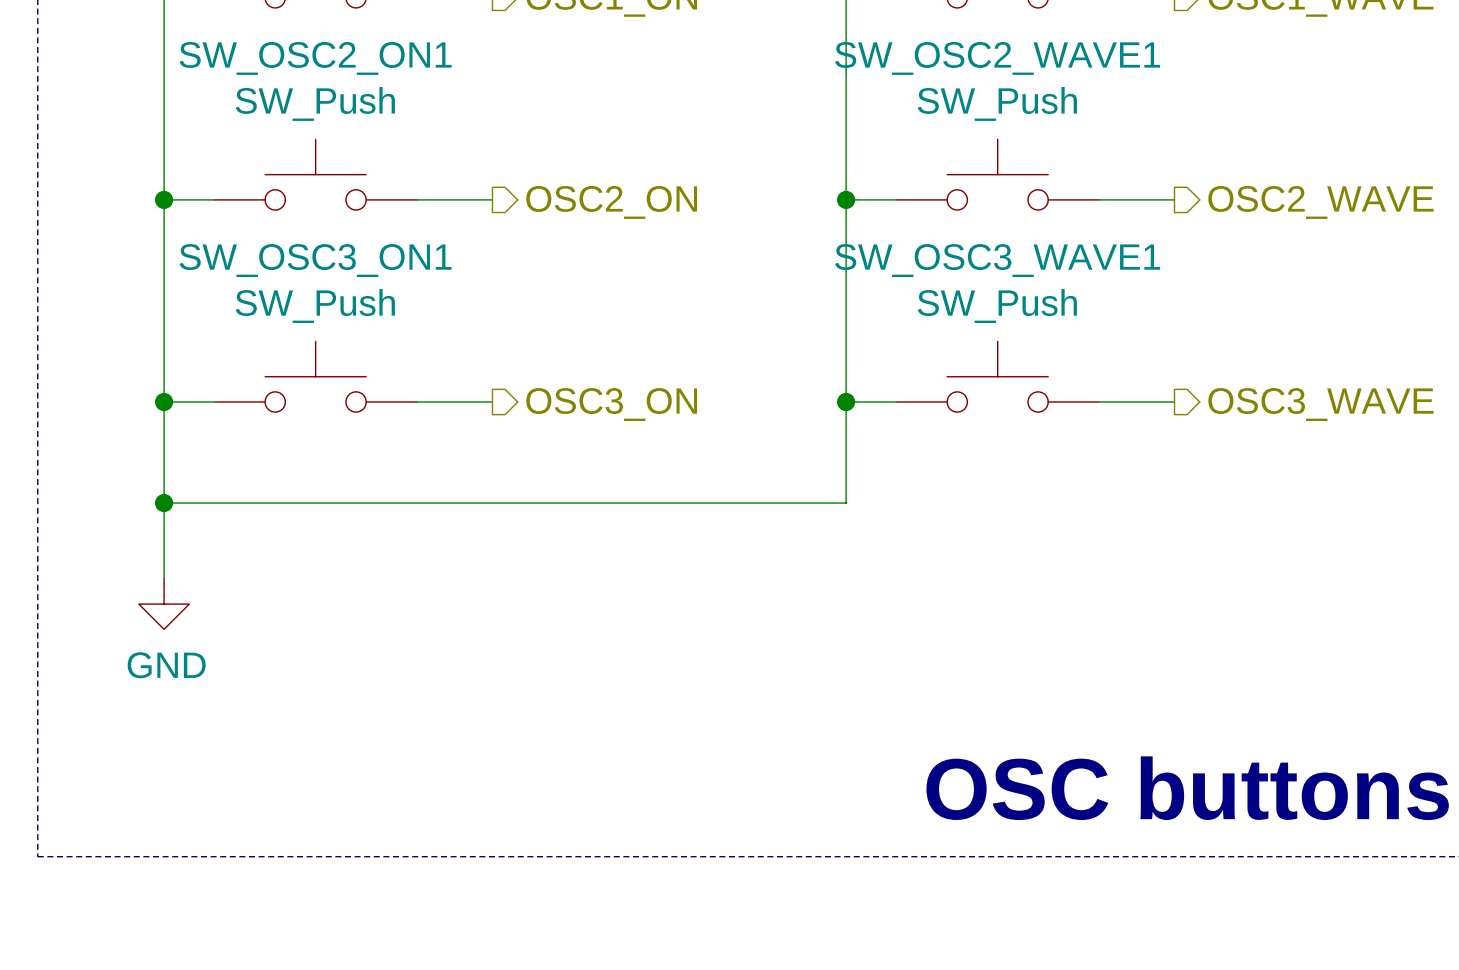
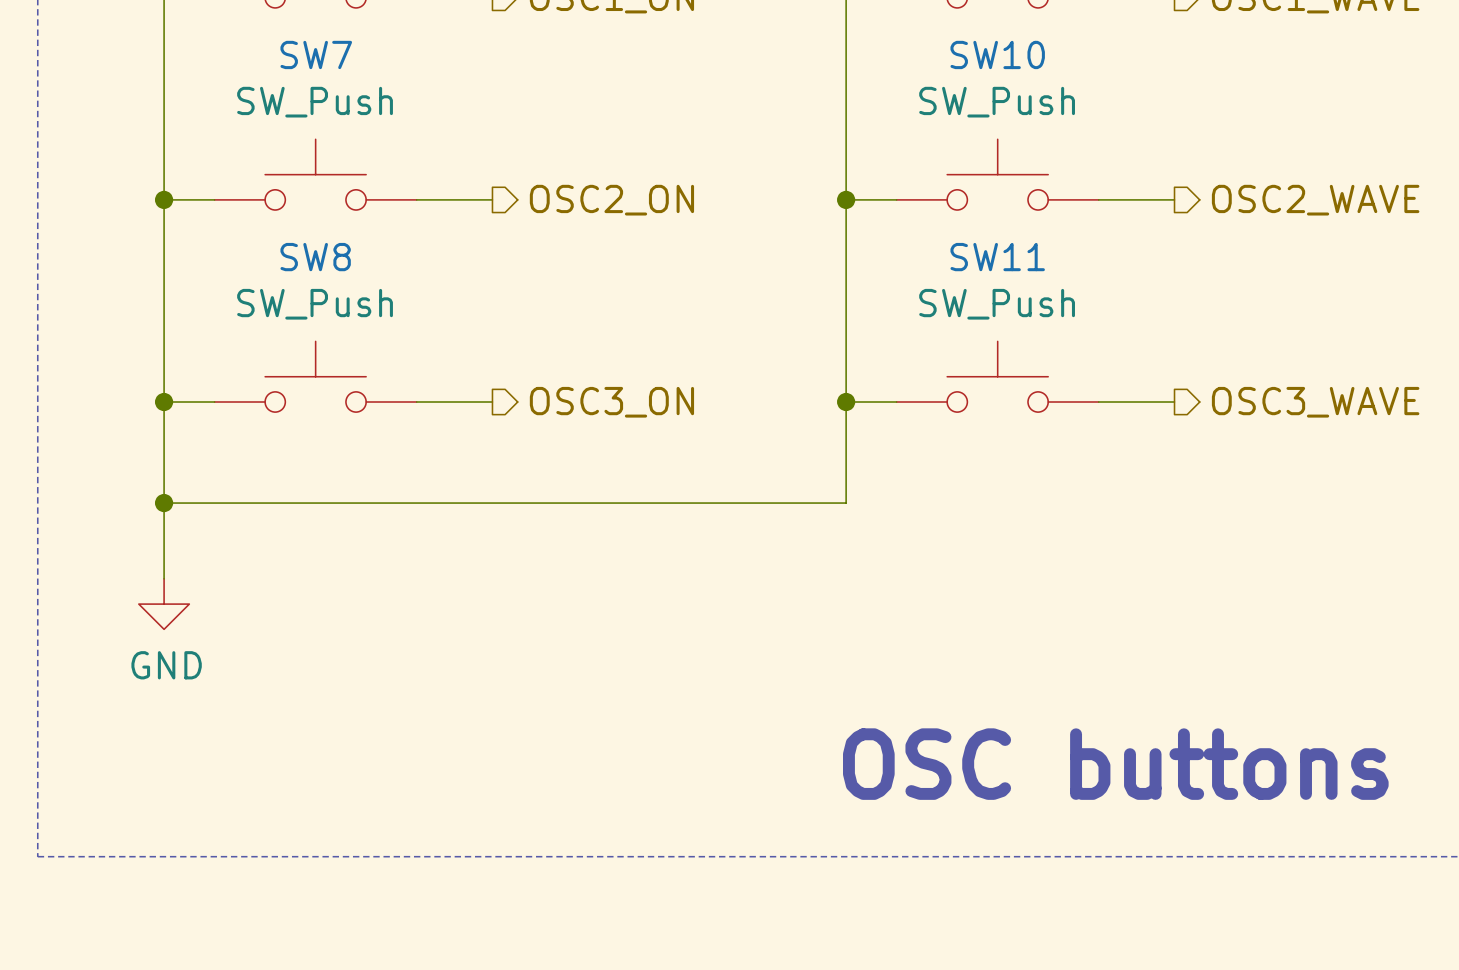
SW_OSC2_ON1 name: SW_OSC2_ON1 (315, 58) -> SW7 (316, 54)
SW_OSC2_WAVE1 name: SW_OSC2_WAVE1 (997, 58) -> SW10 (997, 54)
SW_OSC3_ON1 name: SW_OSC3_ON1 (315, 260) -> SW8 (315, 257)
SW_OSC3_WAVE1 name: SW_OSC3_WAVE1 (997, 260) -> SW11 (997, 257)
text position: OSC buttons (1187, 788) -> OSC buttons (1115, 764)

